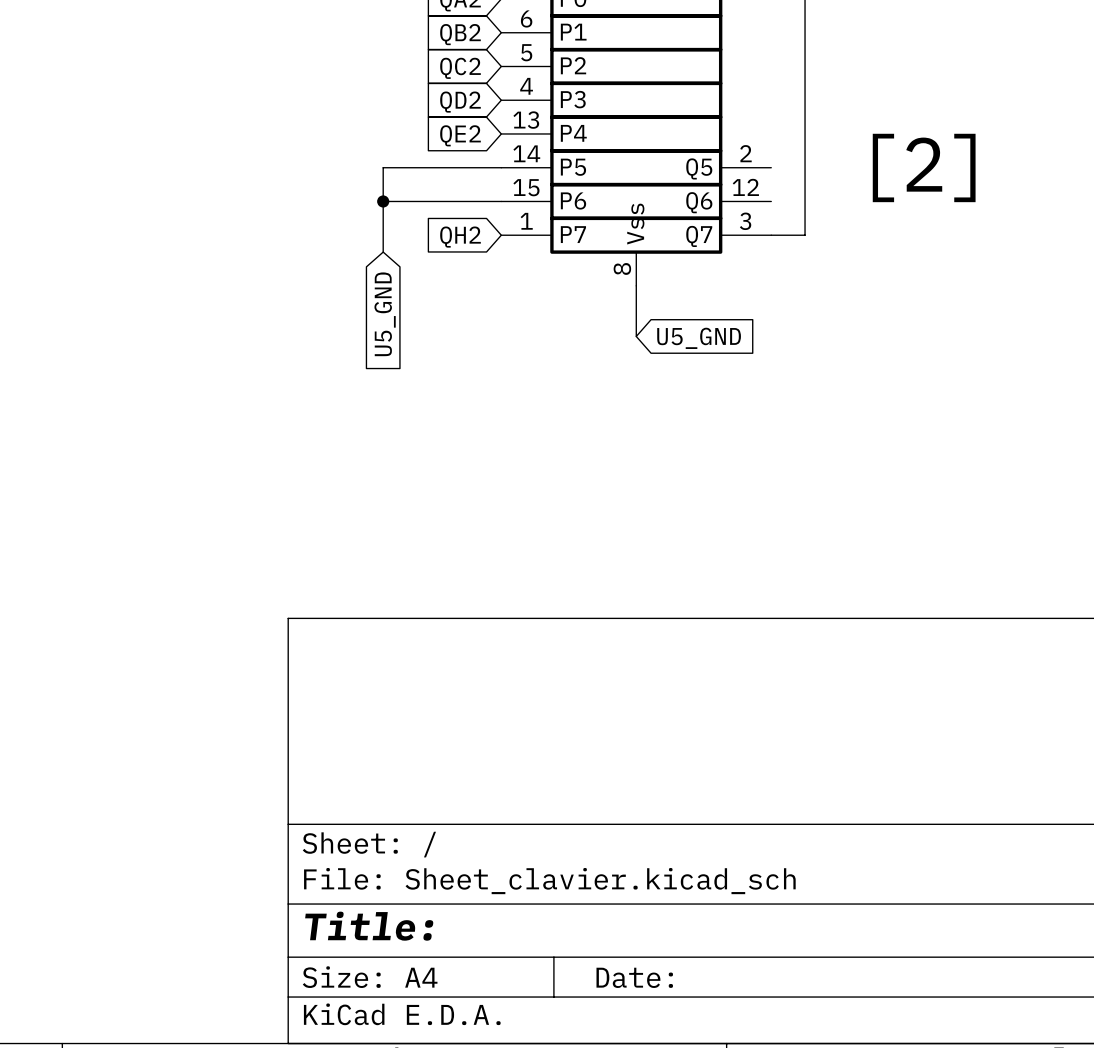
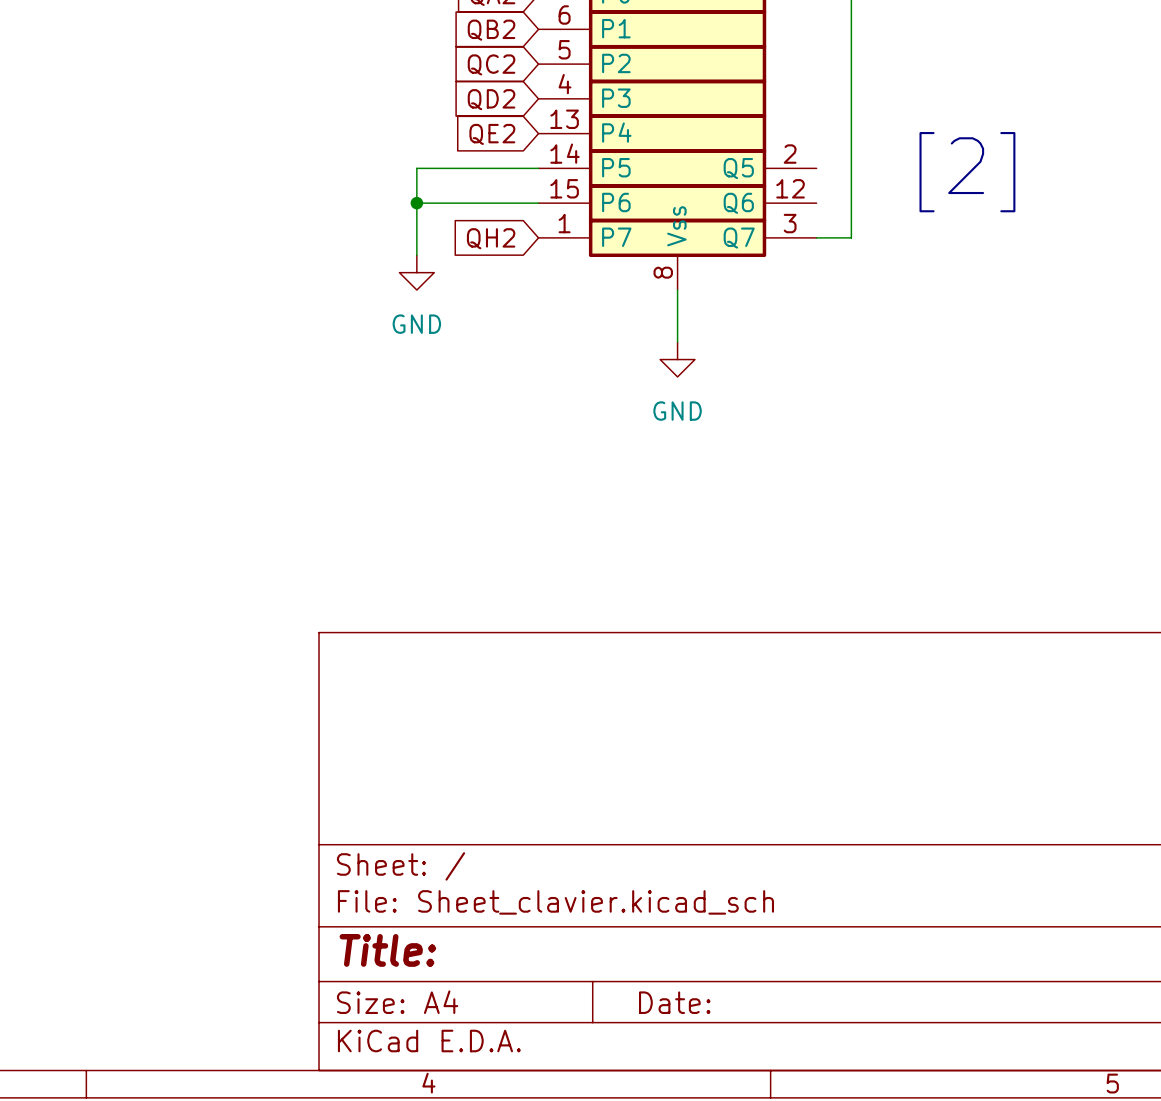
power symbol: none -> GND (416, 272)
global label: U5_GND (385, 314) -> none
global label: U5_GND (699, 338) -> none
power symbol: none -> GND (677, 359)

